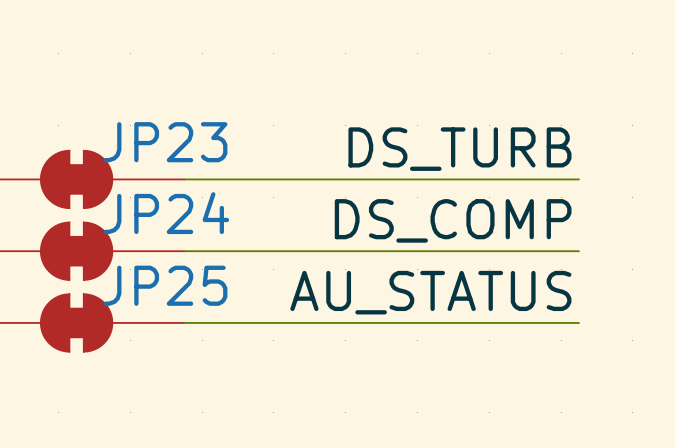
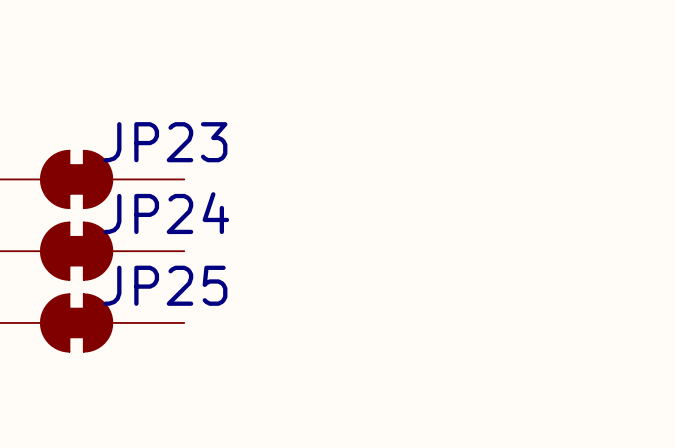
label: DS_TURB (459, 149) -> none
wire: (184, 179) (578, 179) -> none
label: DS_COMP (453, 220) -> none
wire: (184, 251) (578, 251) -> none
label: AU_STATUS (430, 292) -> none
wire: (184, 322) (578, 322) -> none

